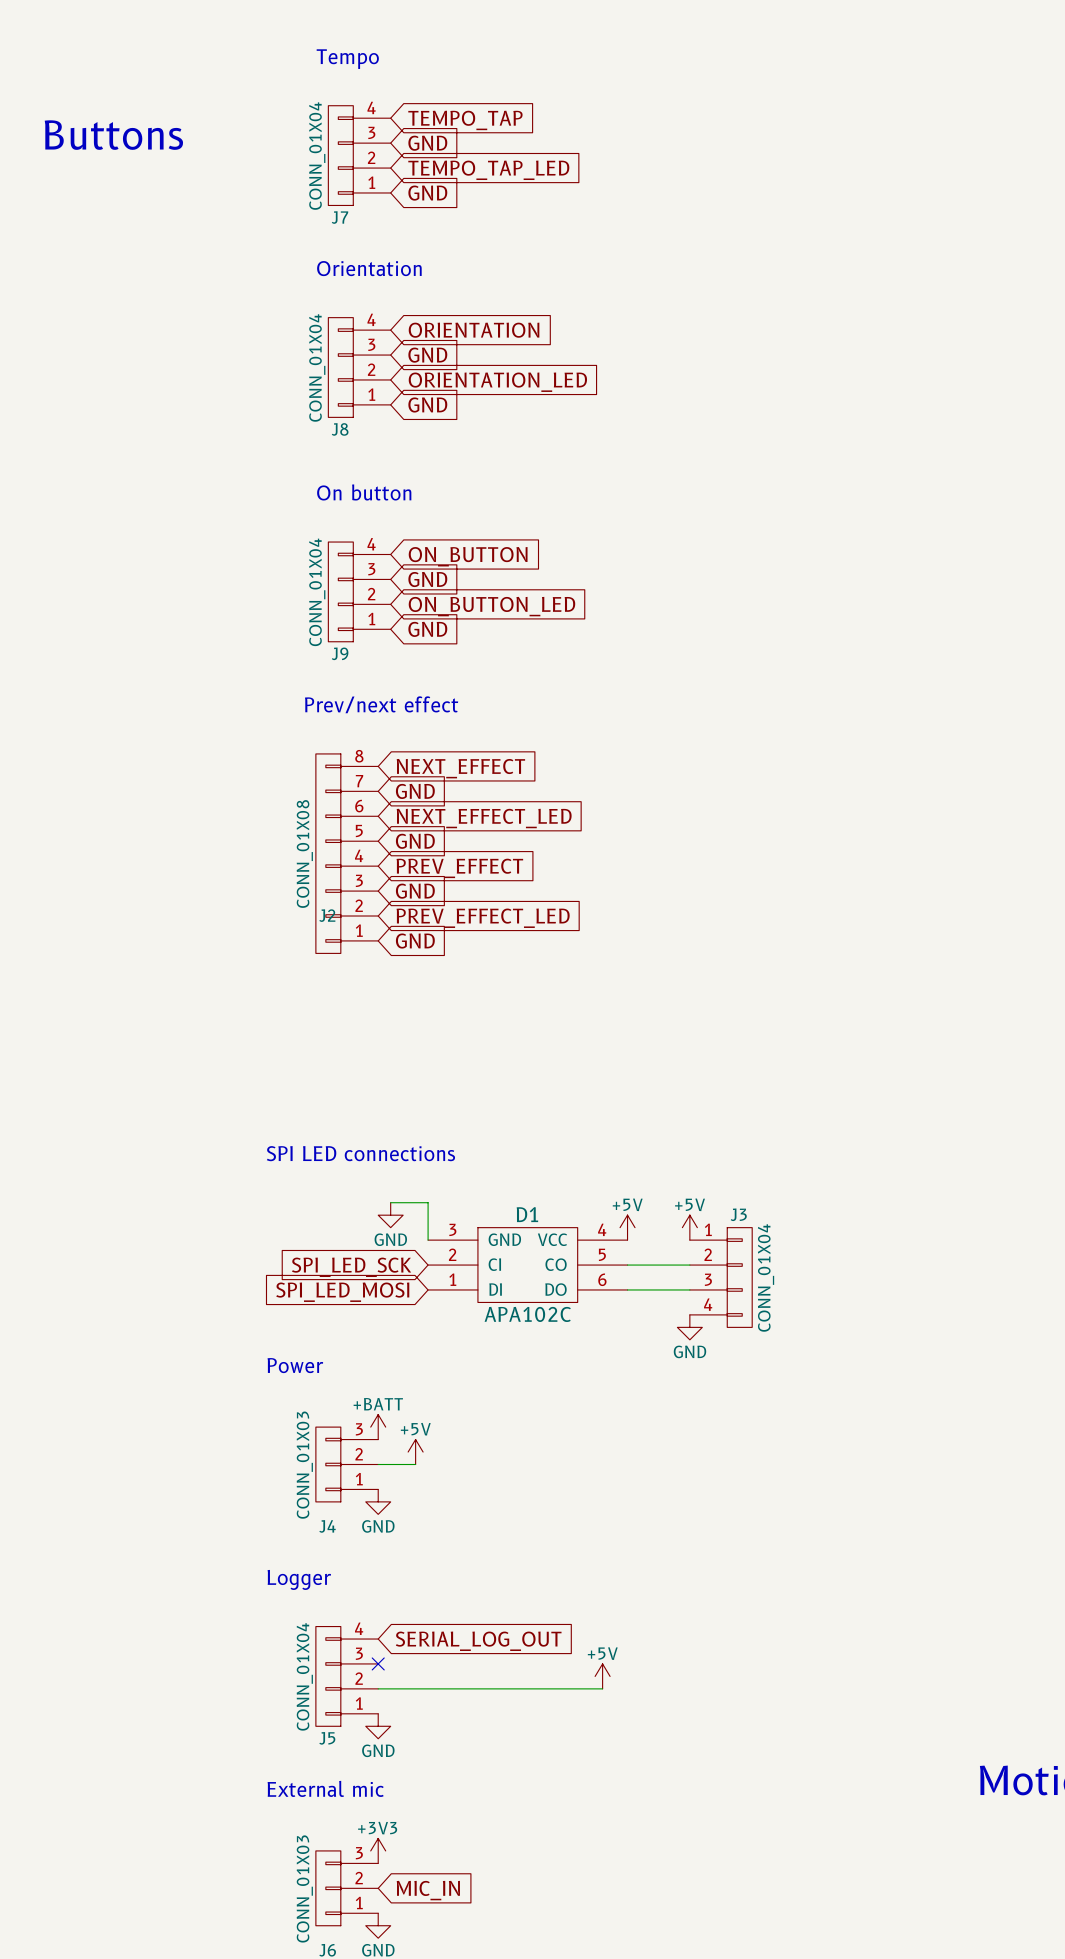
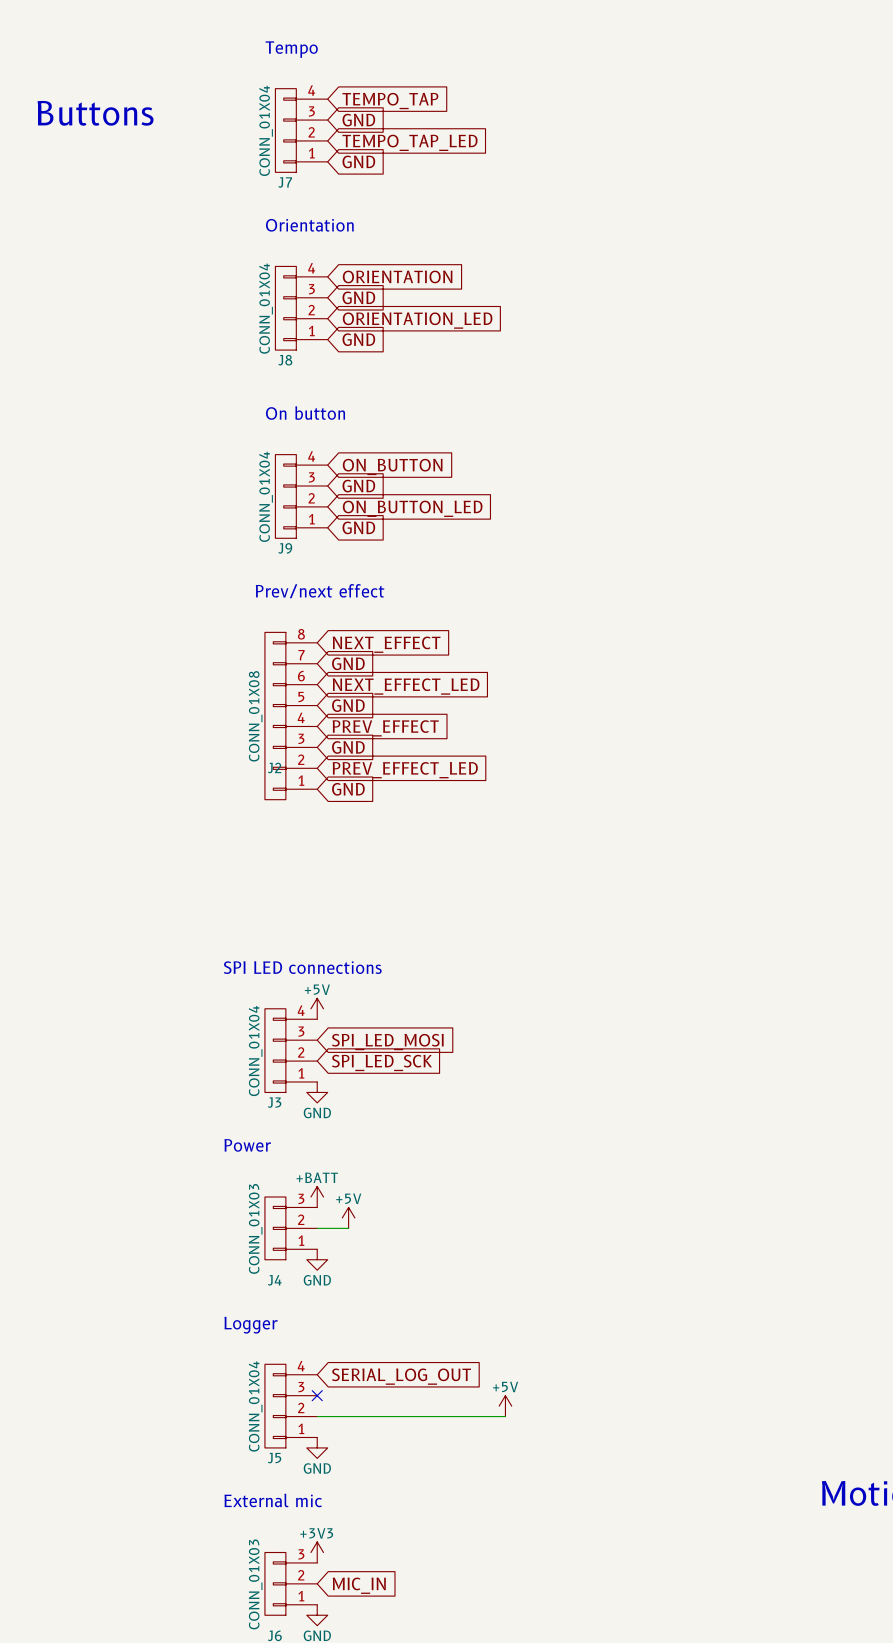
power symbol: none -> +5V (317, 1008)
wire: (390, 1202) (428, 1202) (428, 1240) -> none
power symbol position: GND (390, 1215) -> GND (317, 1092)
power symbol: +5V (627, 1227) -> none
power symbol: +5V (689, 1227) -> none
D1: APA102C (527, 1265) -> none
wire: (627, 1265) (689, 1265) -> none
global label rotation: 0° (351, 1267) -> 180° (382, 1062)
J3 position: (721, 1277) -> (291, 1050)
J3 rotation: 0° (739, 1277) -> 180° (275, 1050)
wire: (627, 1289) (689, 1289) -> none
global label rotation: 0° (342, 1292) -> 180° (387, 1042)
power symbol: GND (689, 1327) -> none

